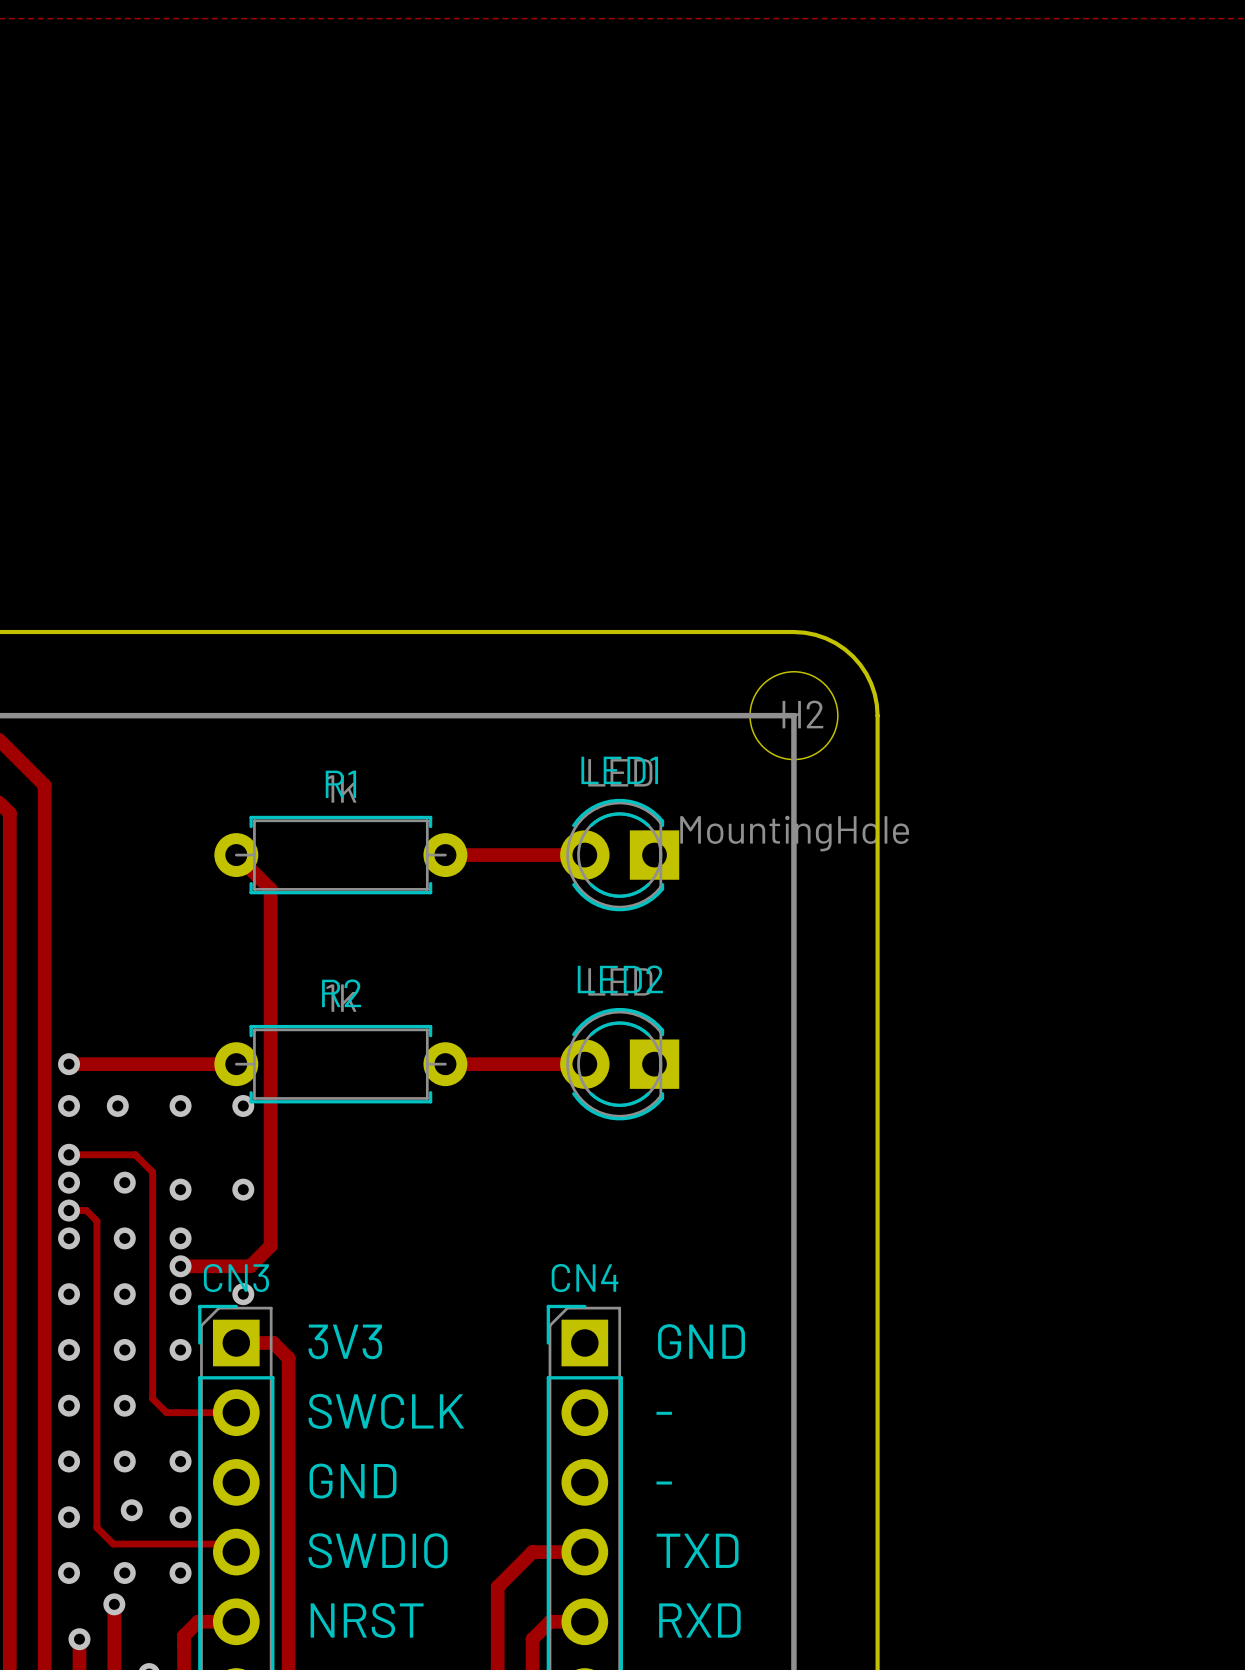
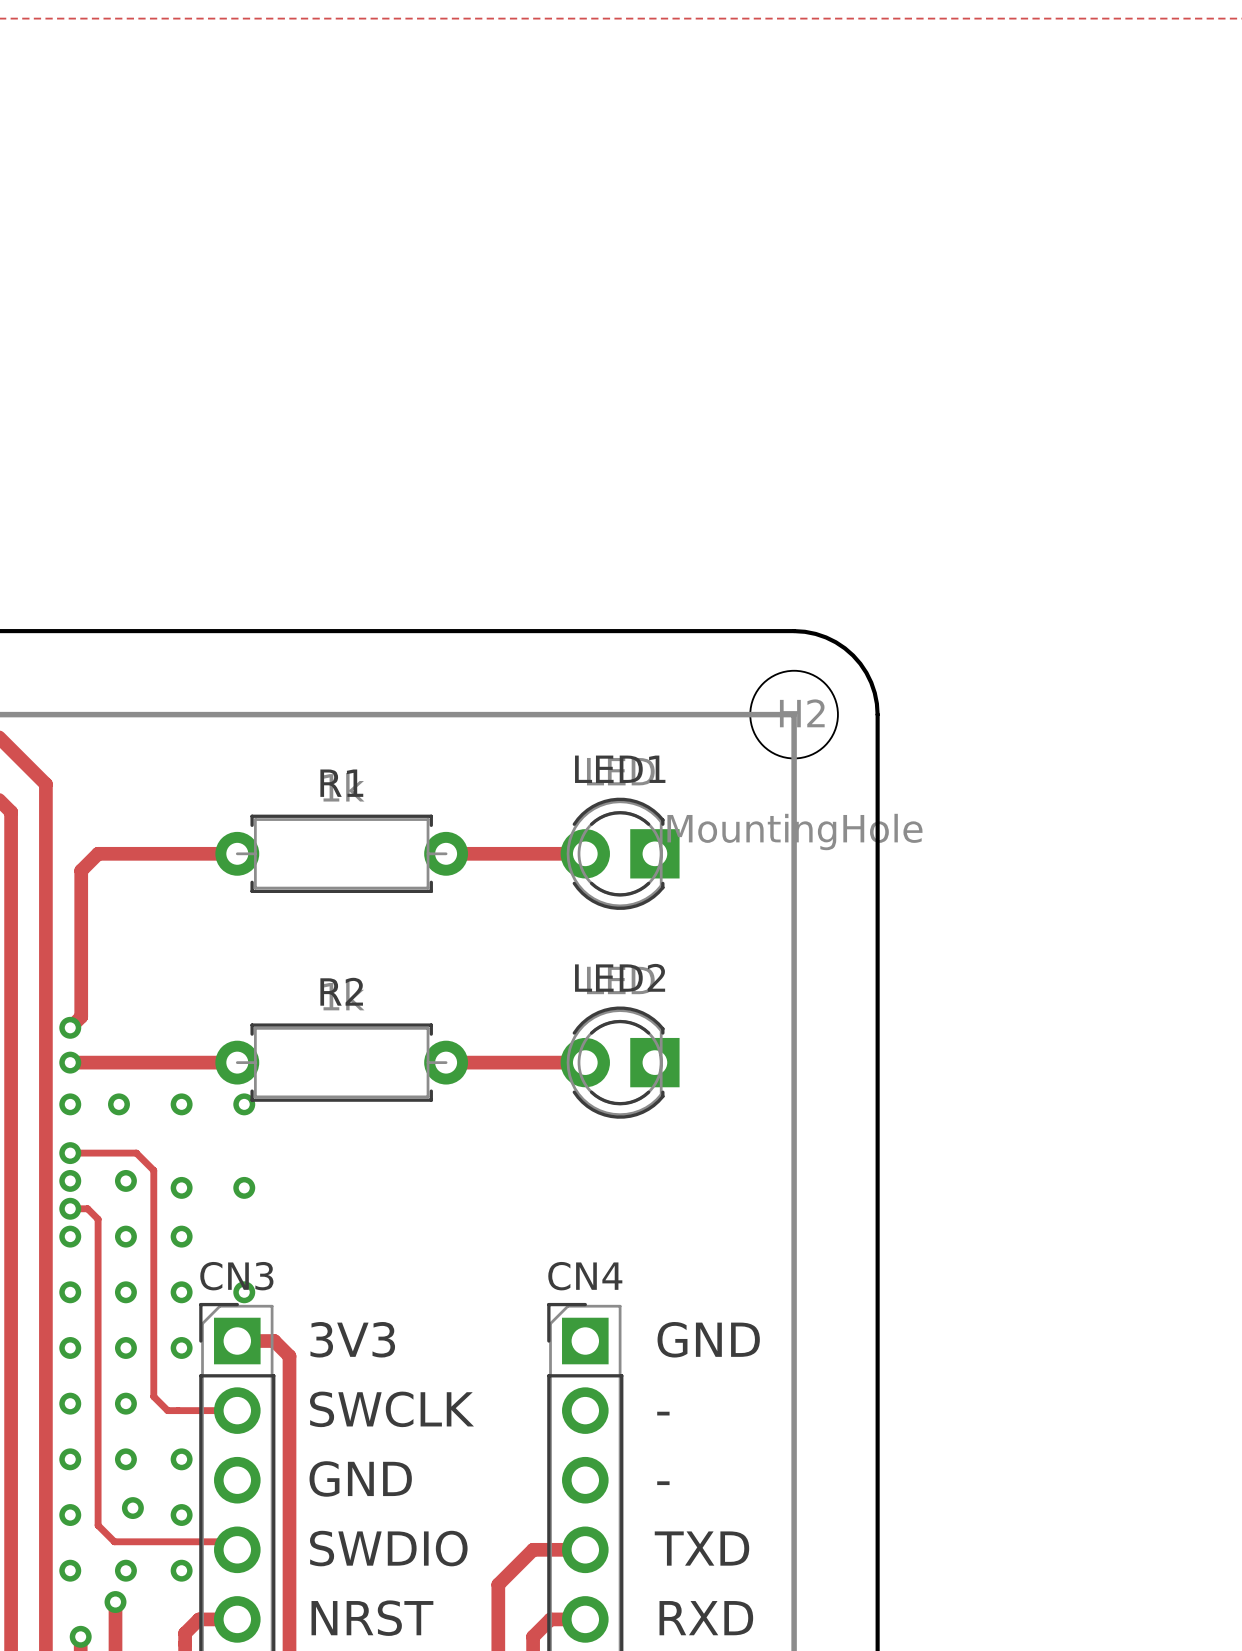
track: (236, 855) (270, 889) (270, 1245) (250, 1266) (180, 1266) -> (237, 853) (98, 853) (81, 870) (81, 1016) (70, 1027)
via: none -> (70, 1027)
via: (180, 1266) -> none

